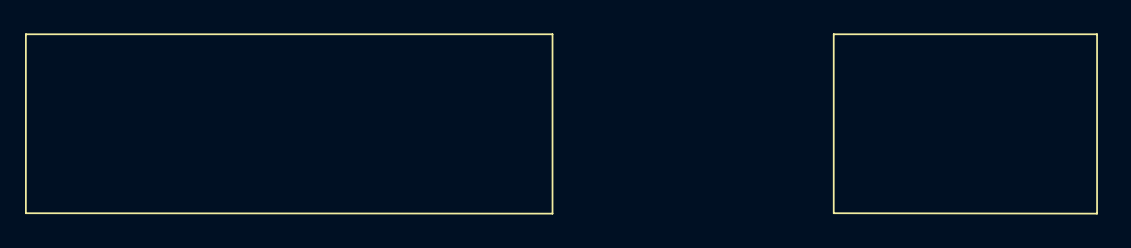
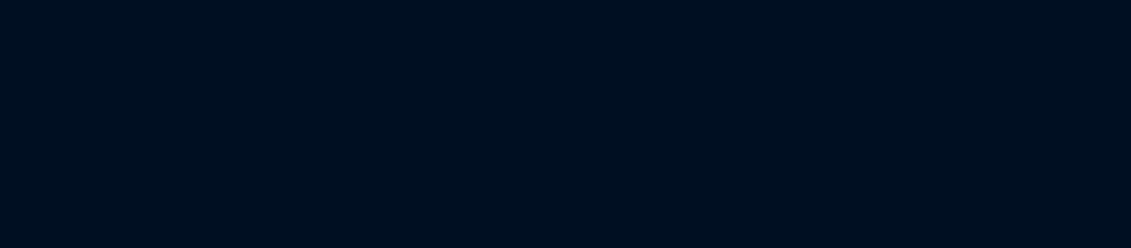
line: (25, 34) (552, 34) (552, 213) (25, 213) (25, 34) -> none
line: (833, 34) (1097, 34) (1097, 213) (833, 213) (833, 34) -> none

